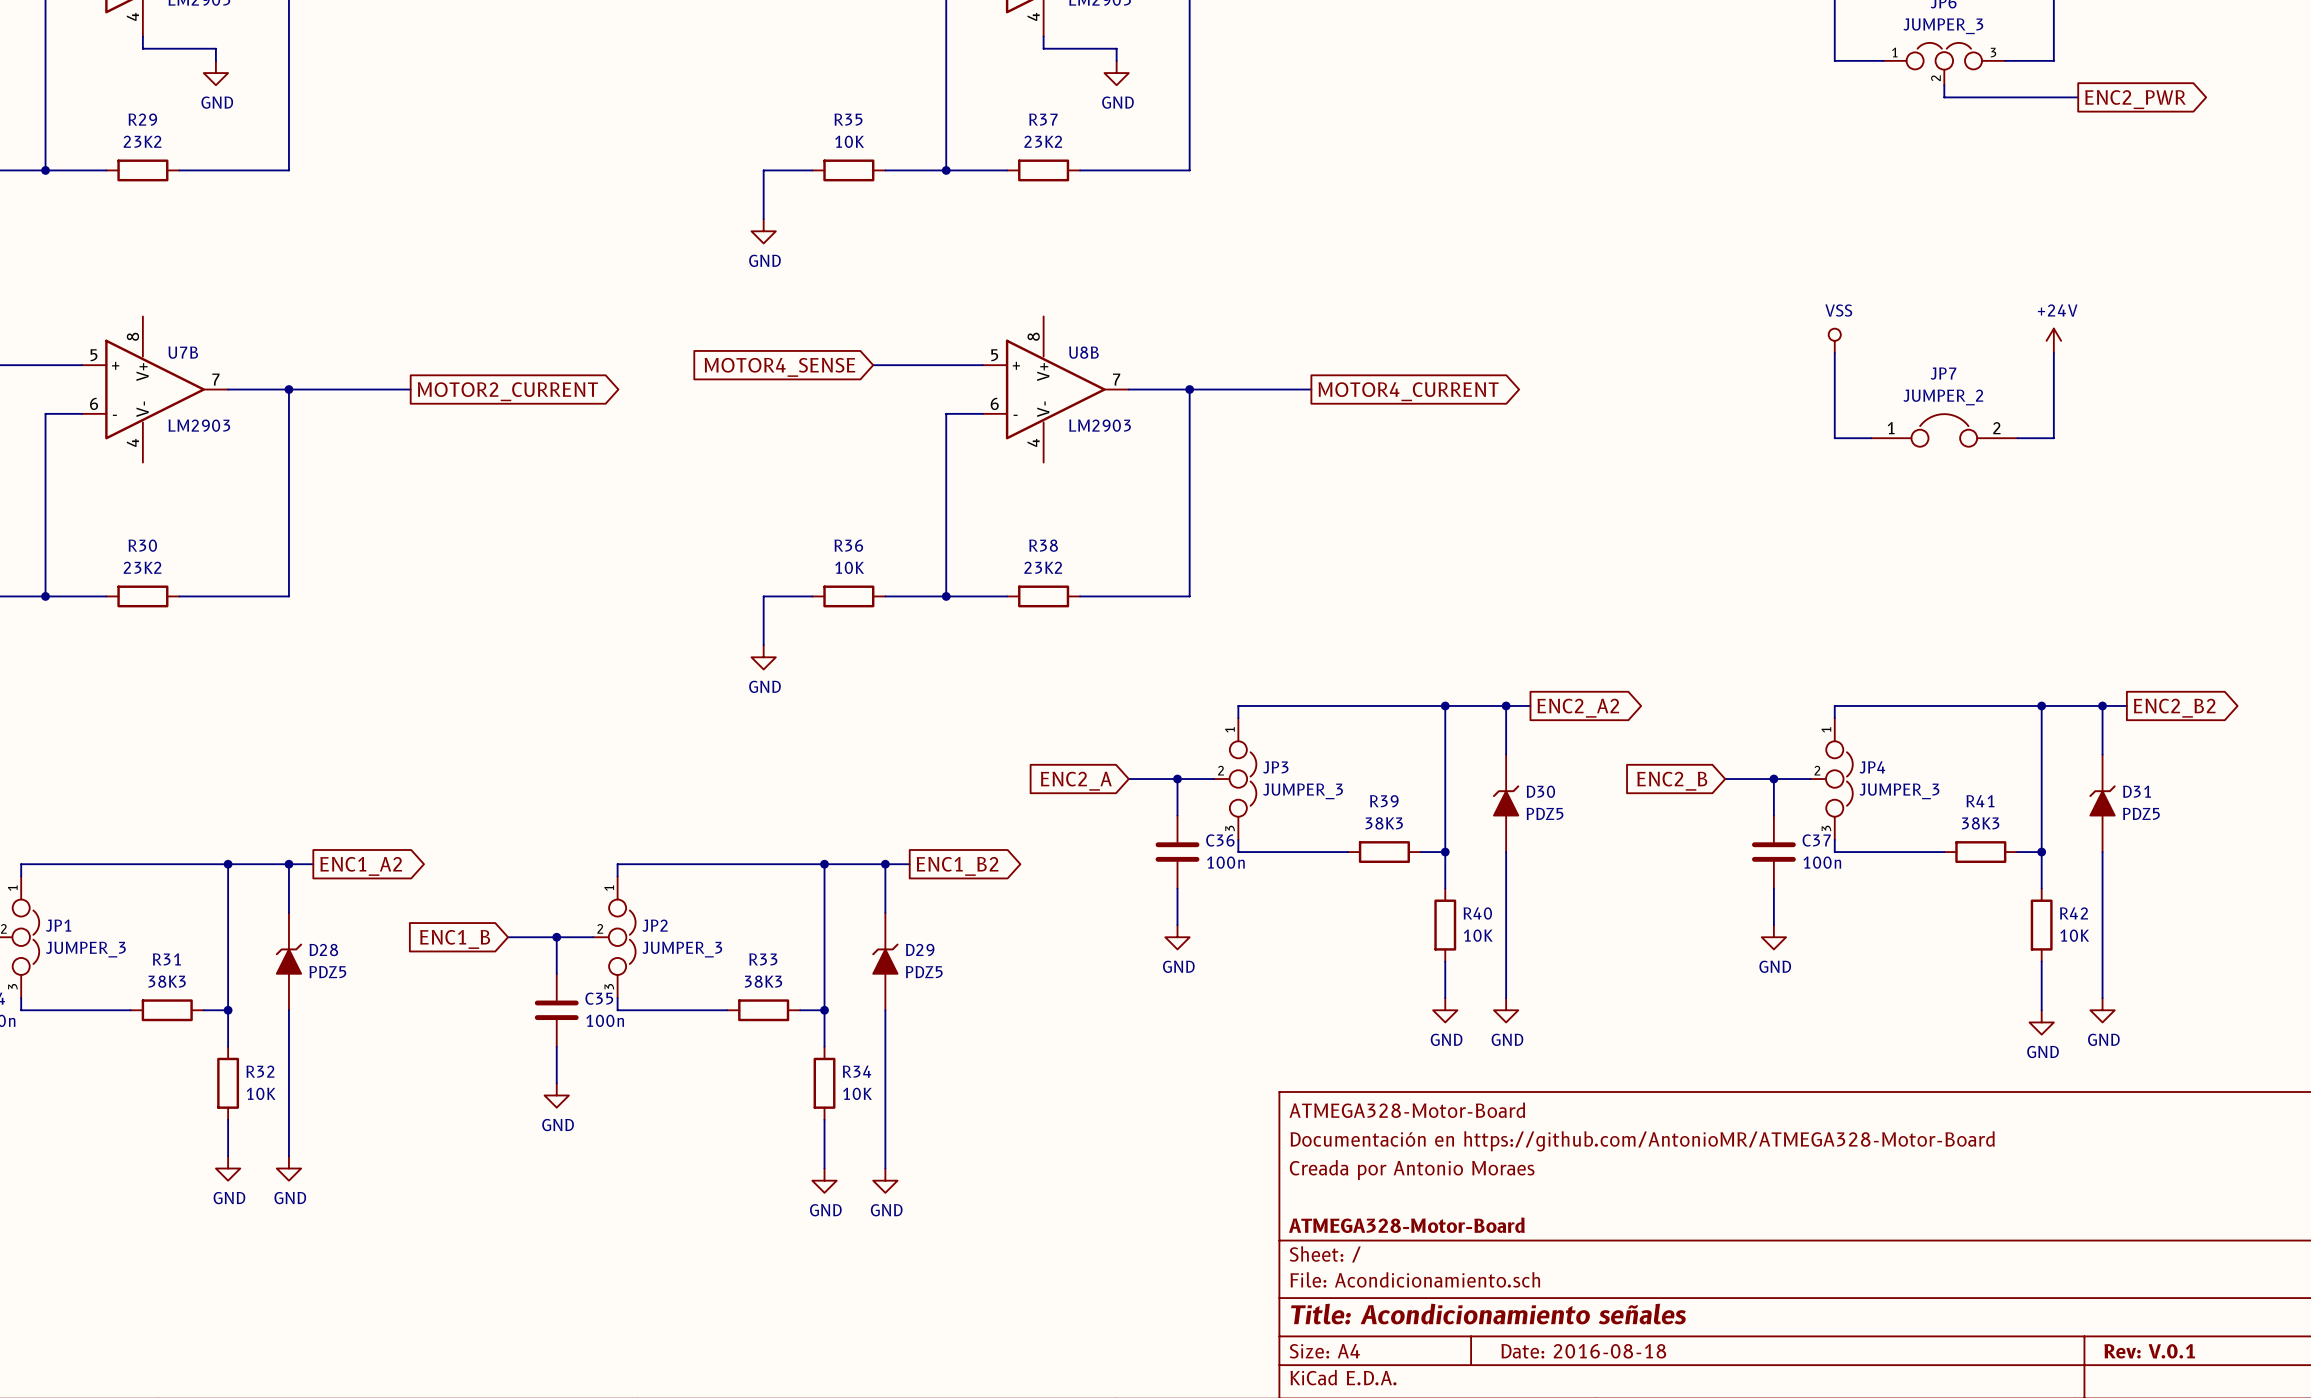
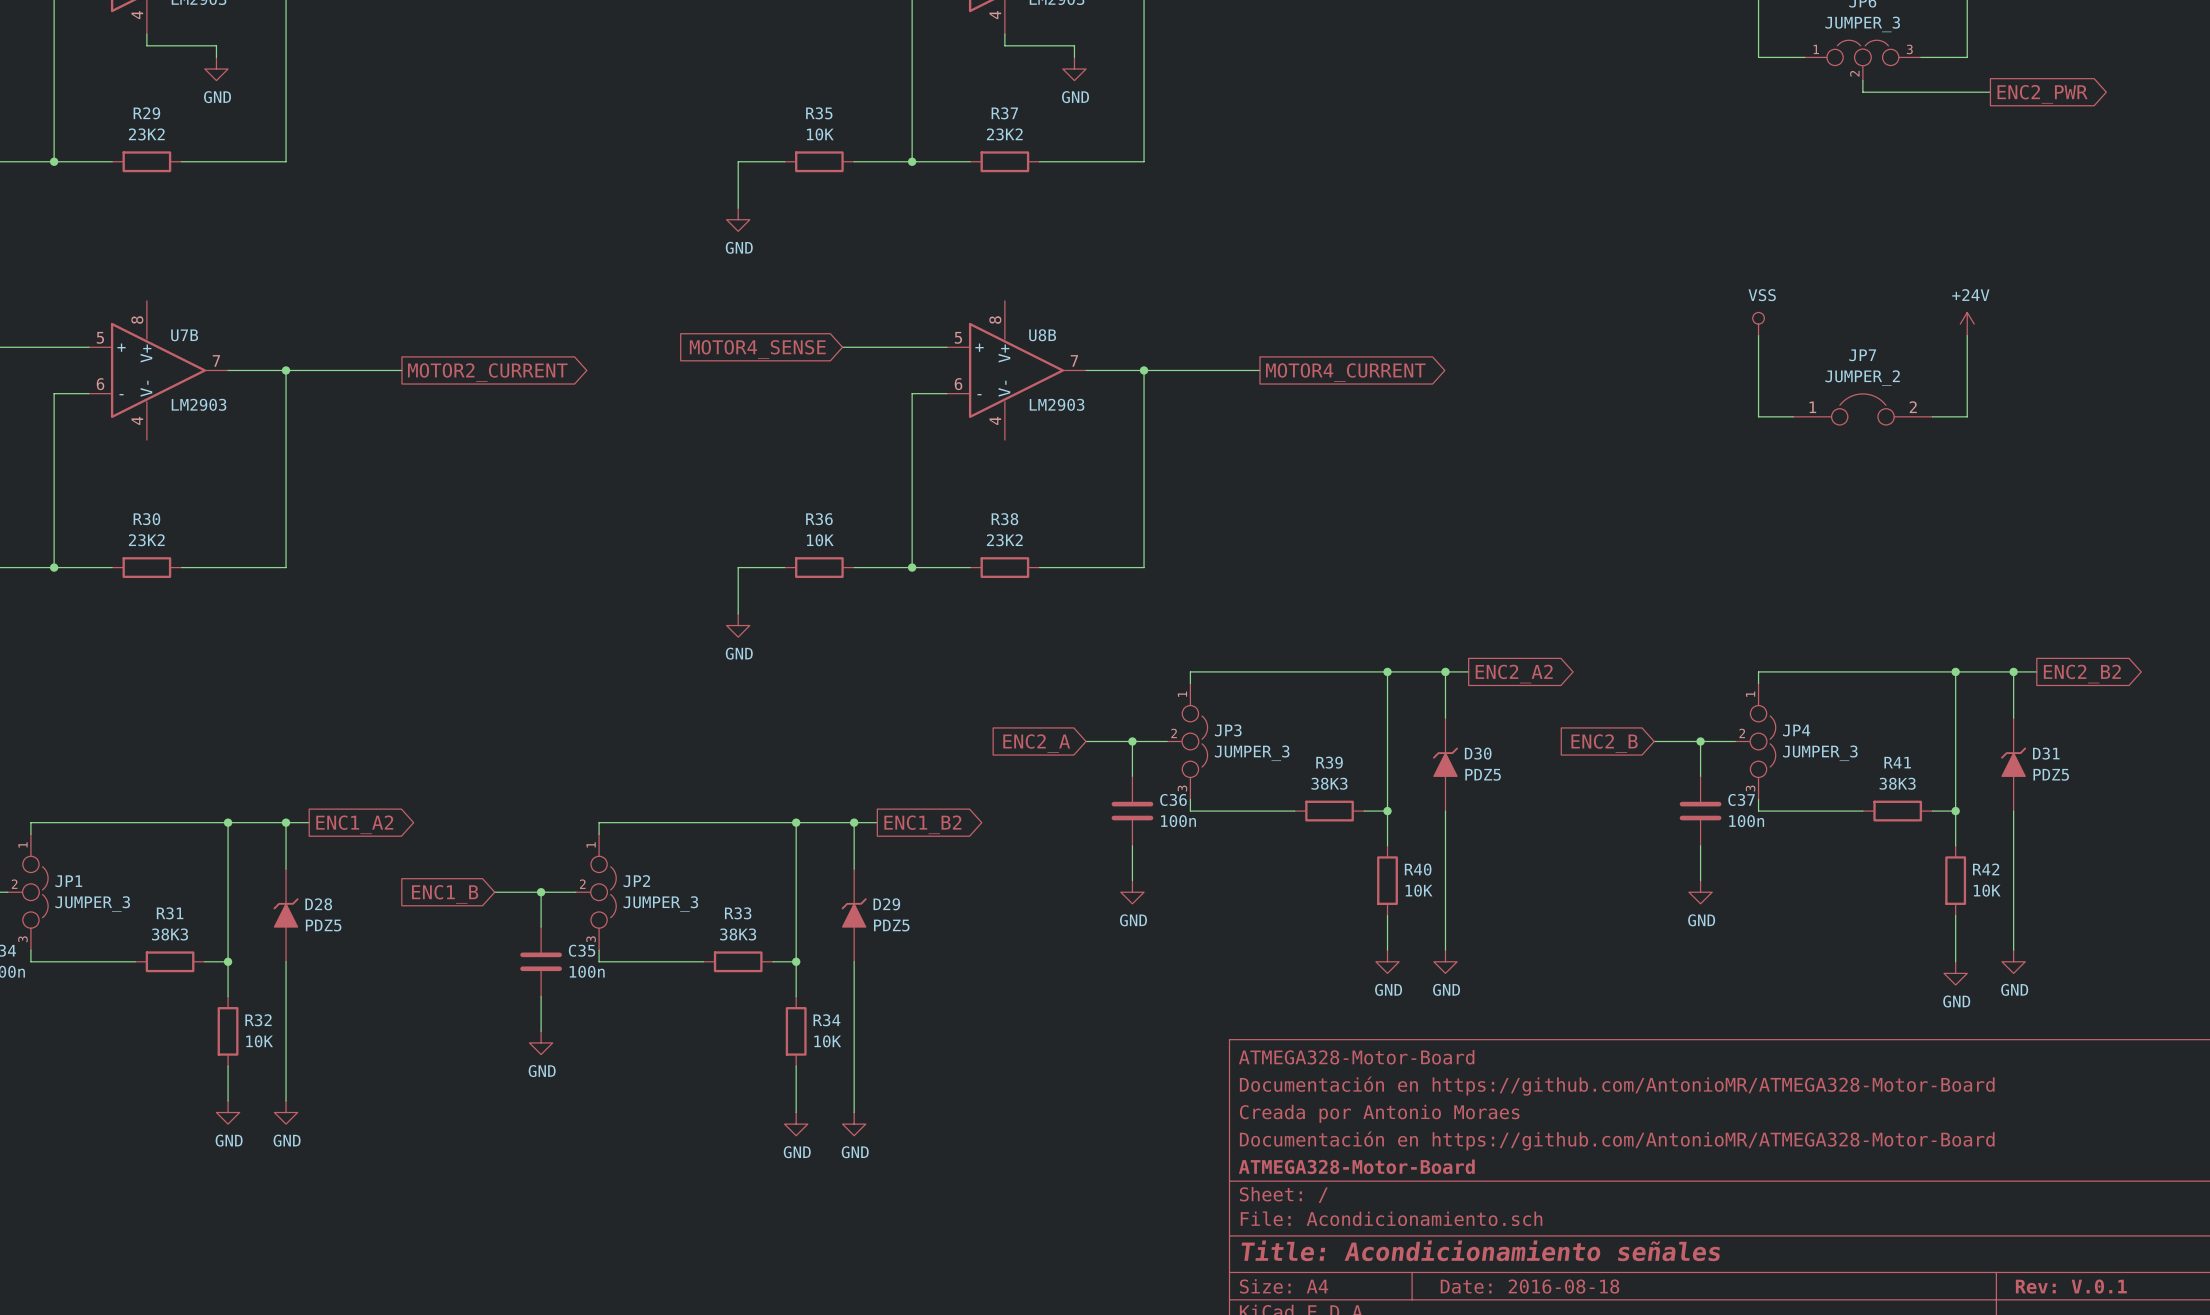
title block: none -> Documentación en https://github.com/AntonioMR/ATMEGA328-Motor-Board (1617, 1140)

